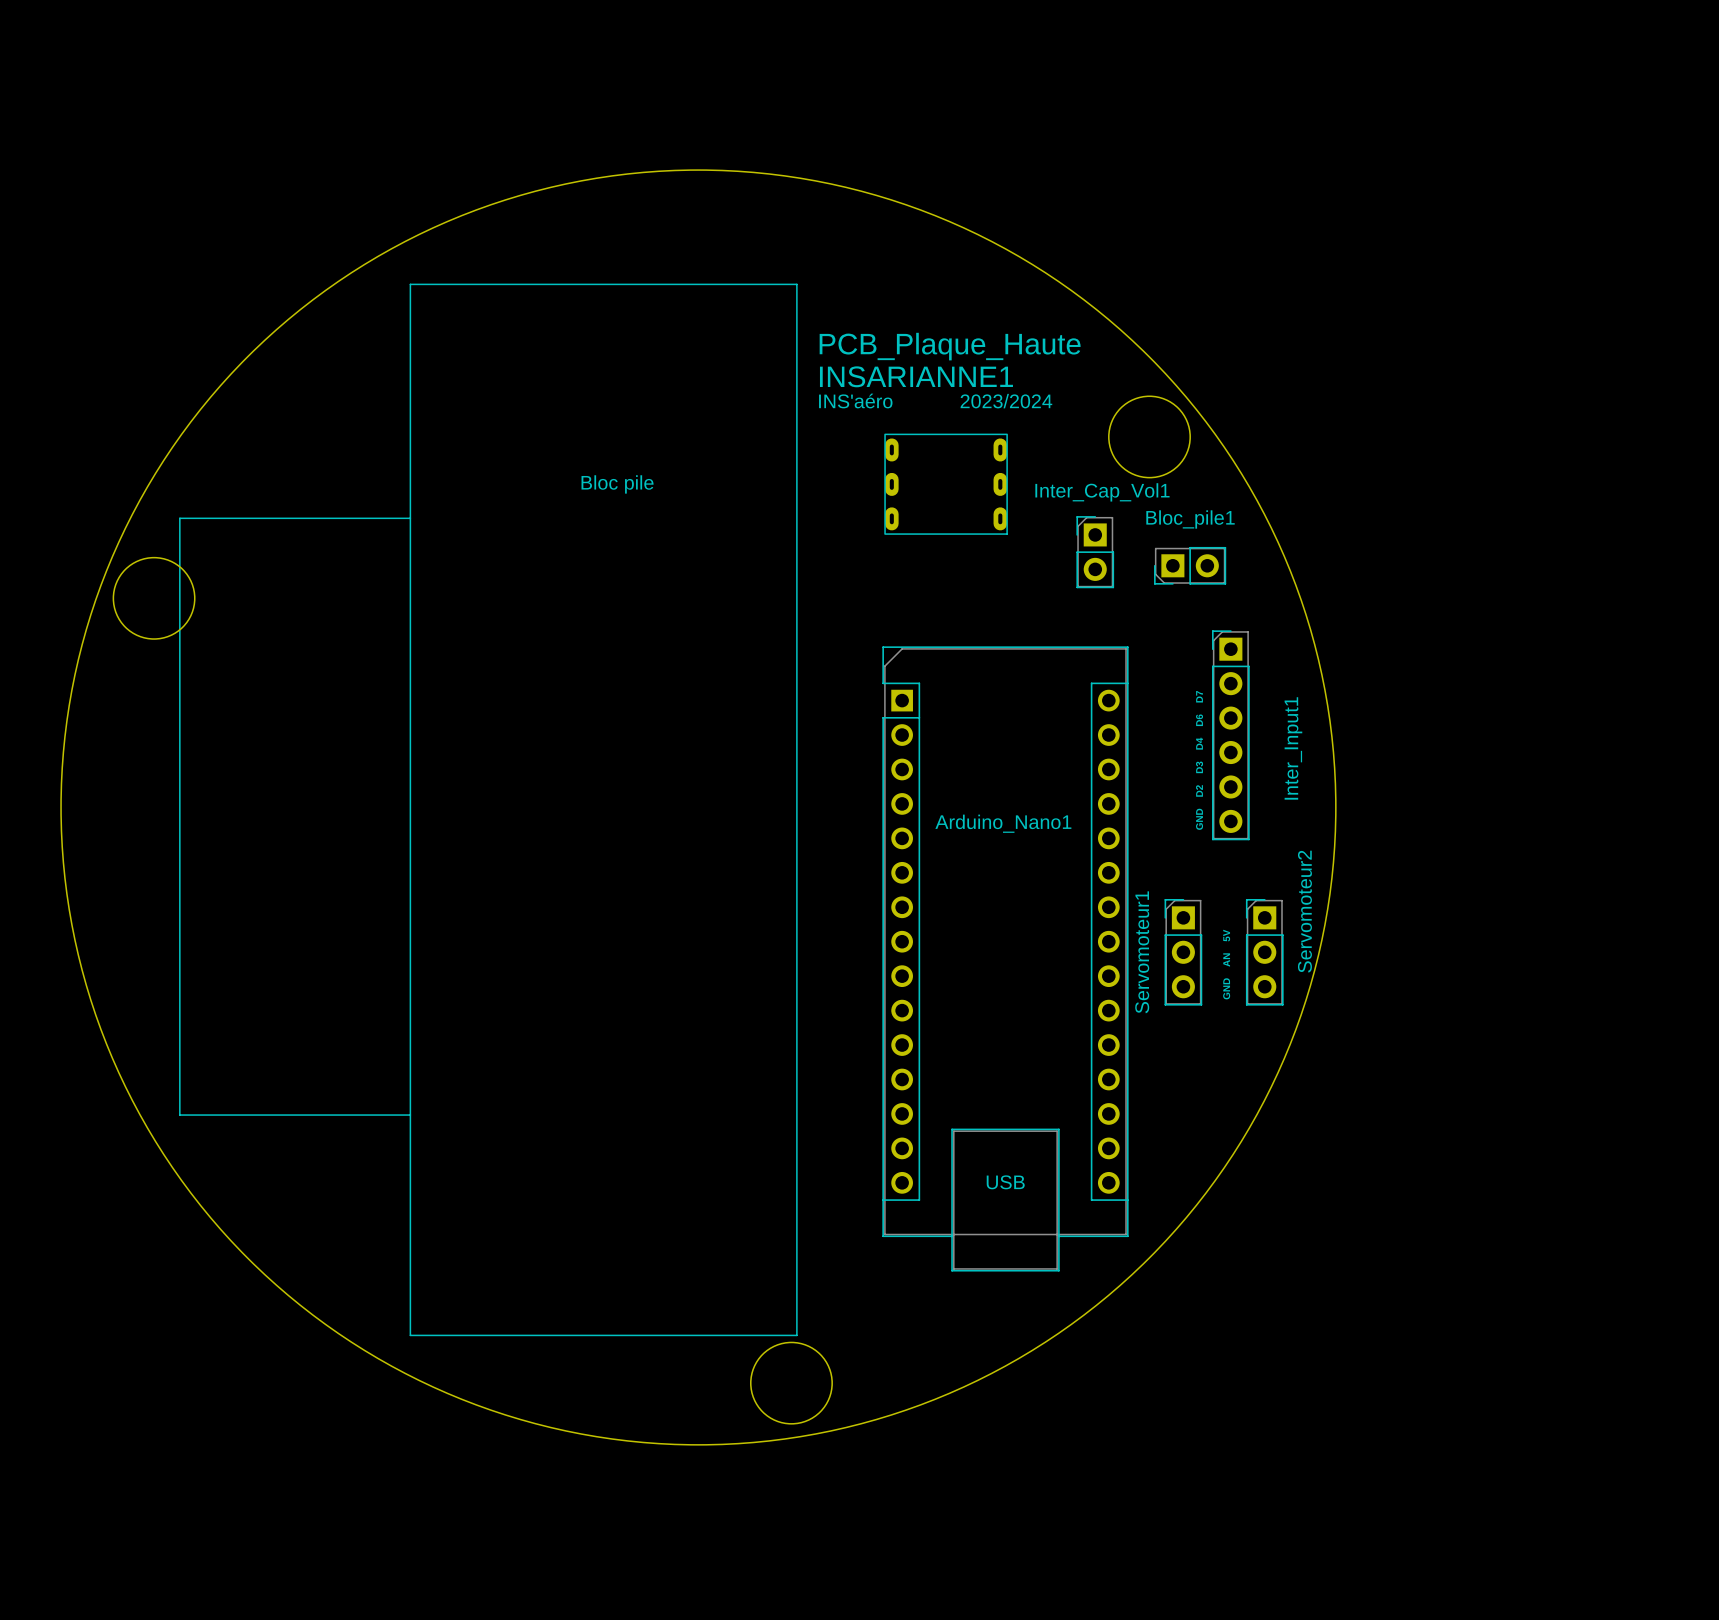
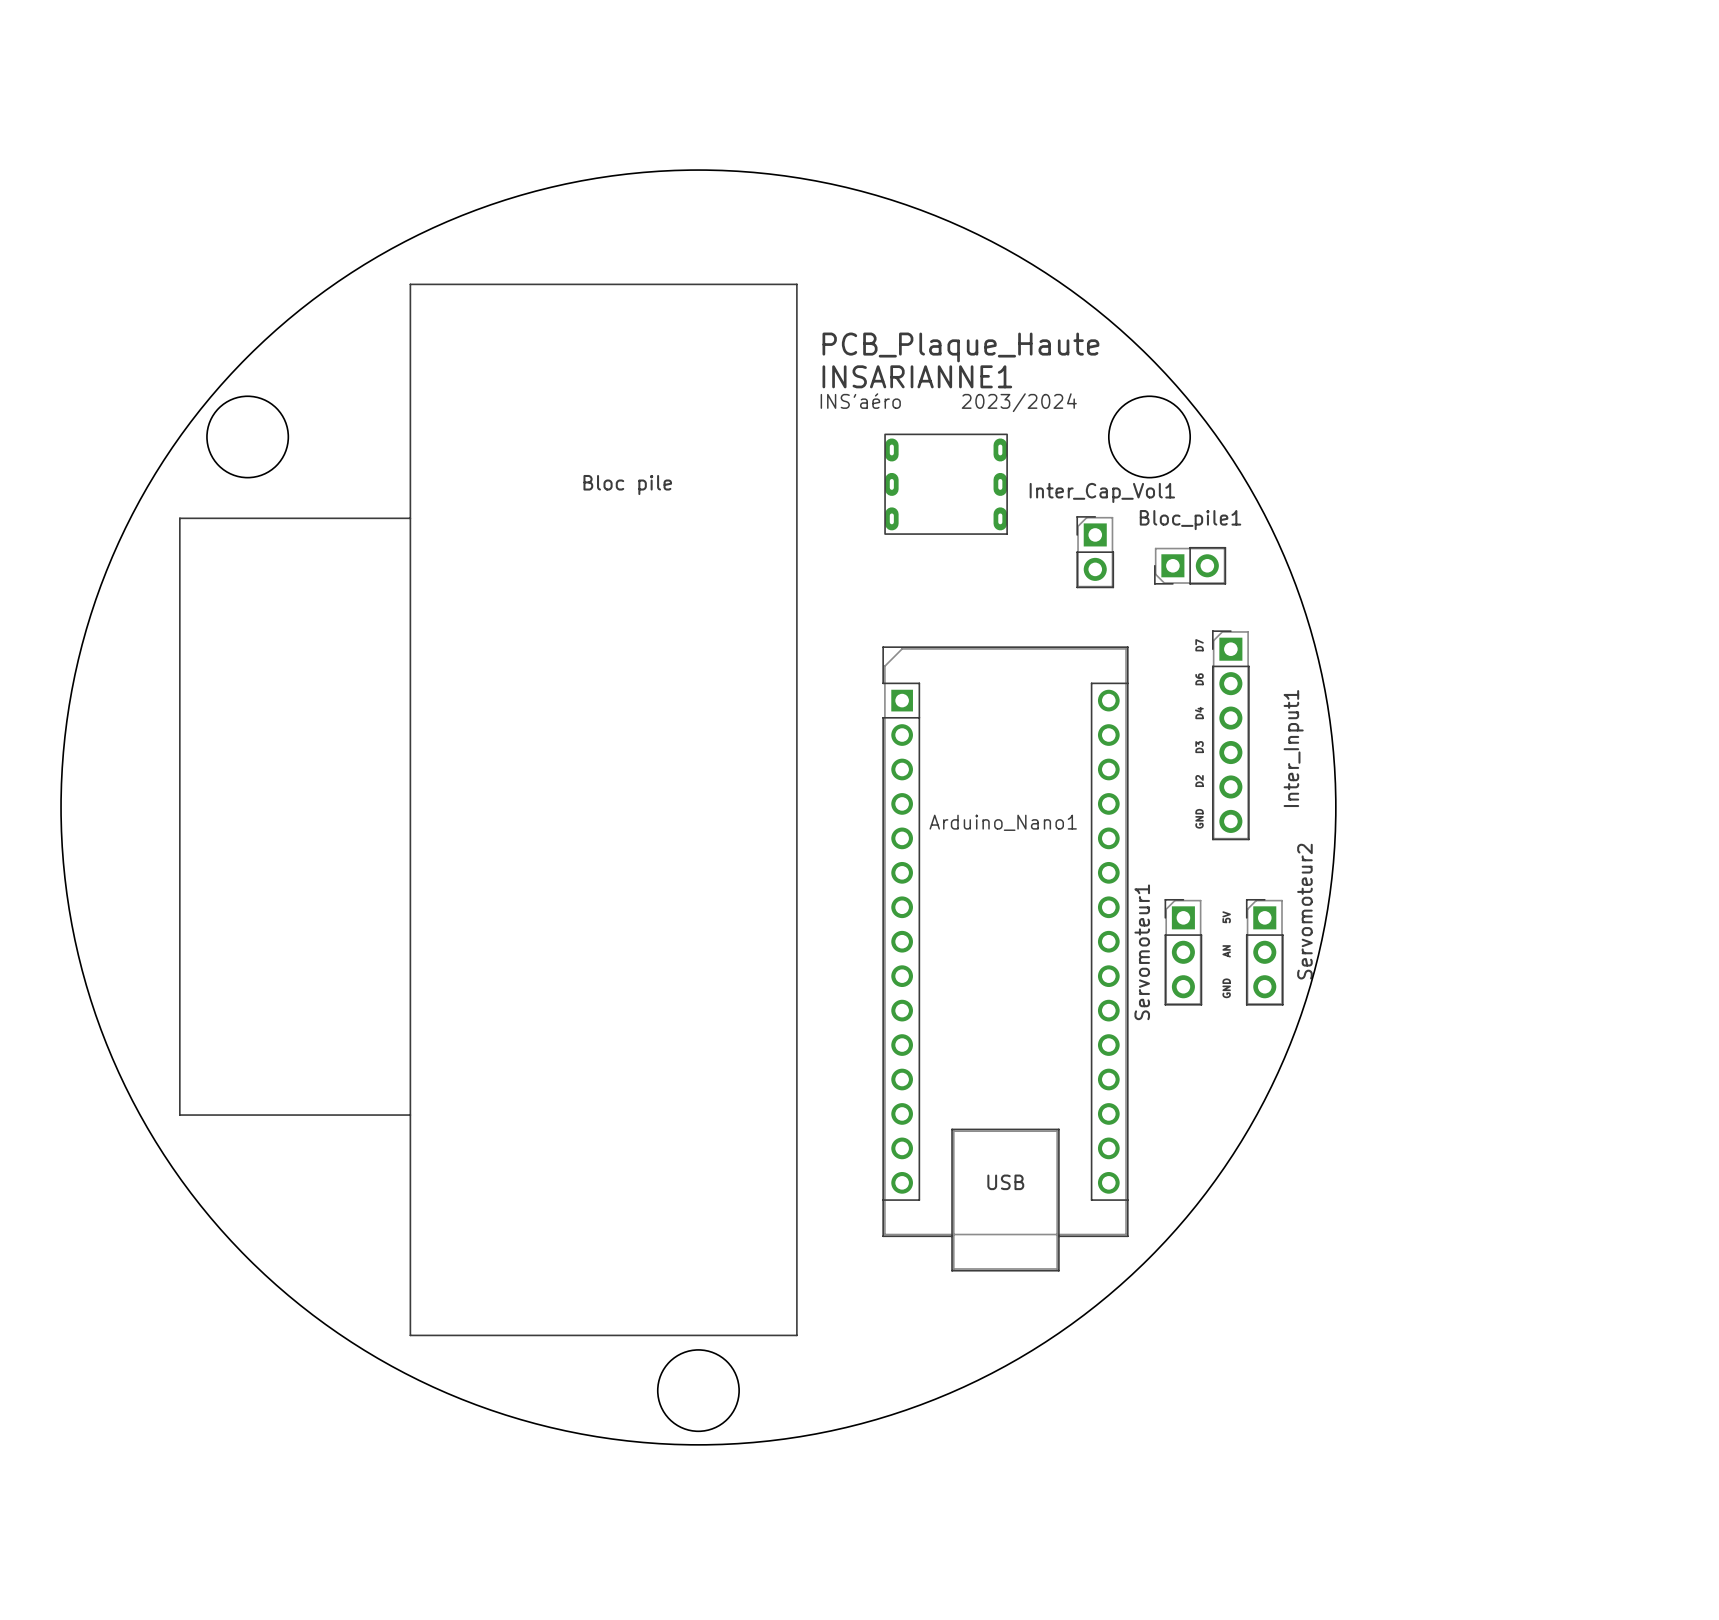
round board edge position: (154, 598) -> (247, 436)
round board edge position: (791, 1383) -> (698, 1390)

